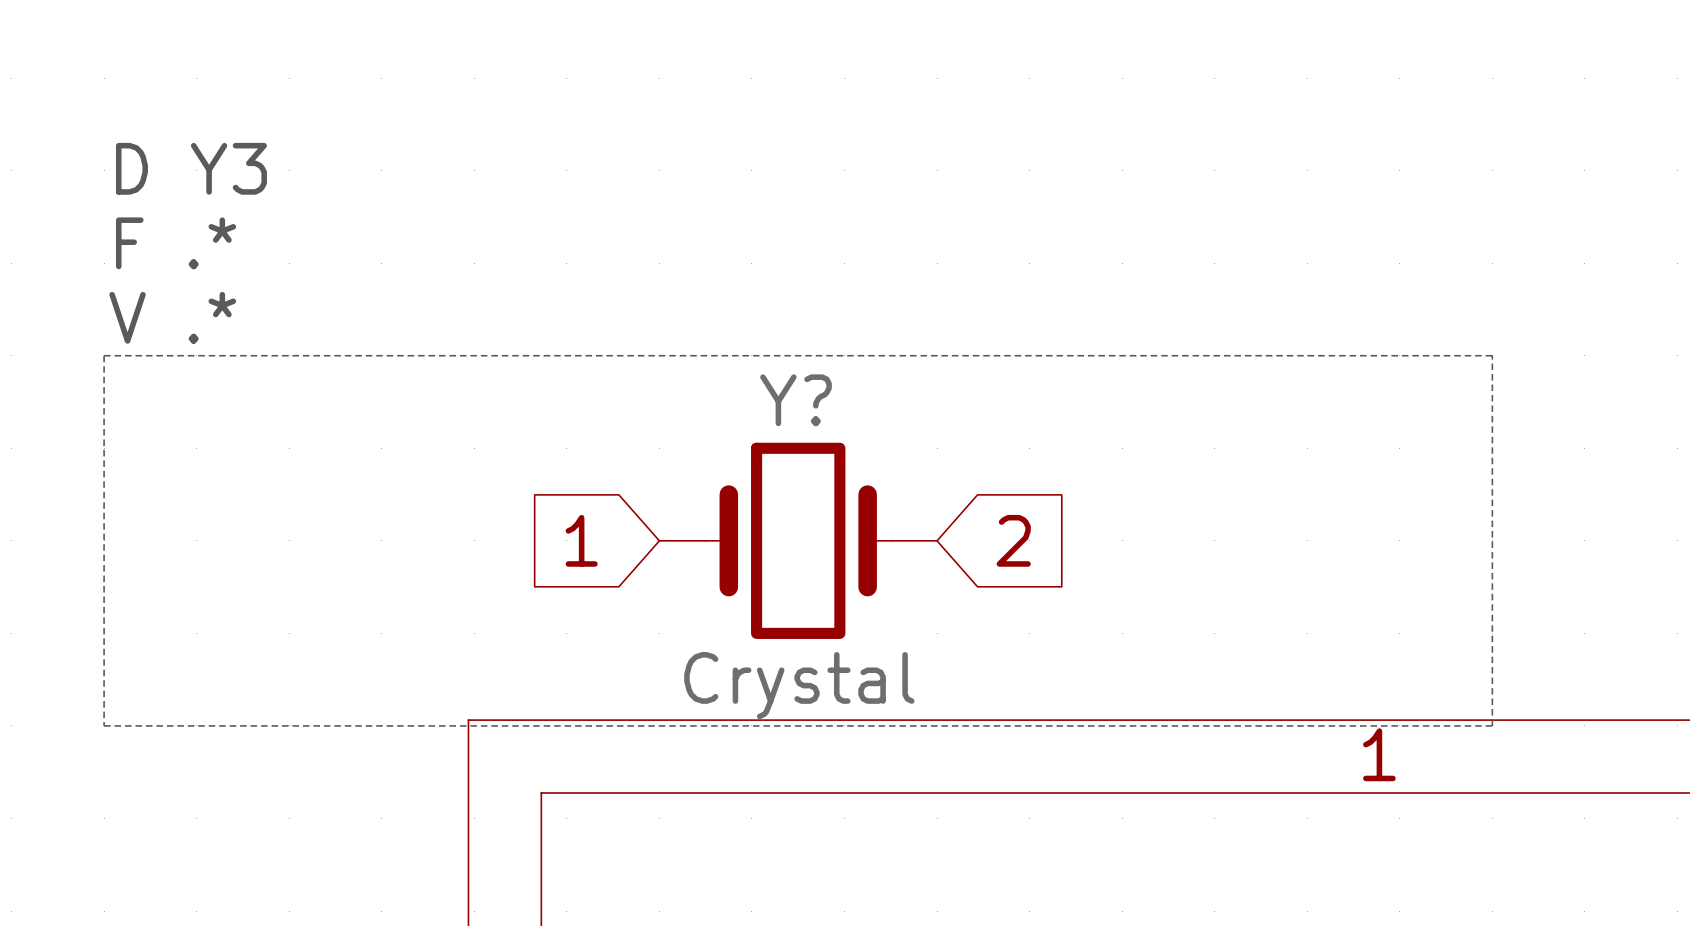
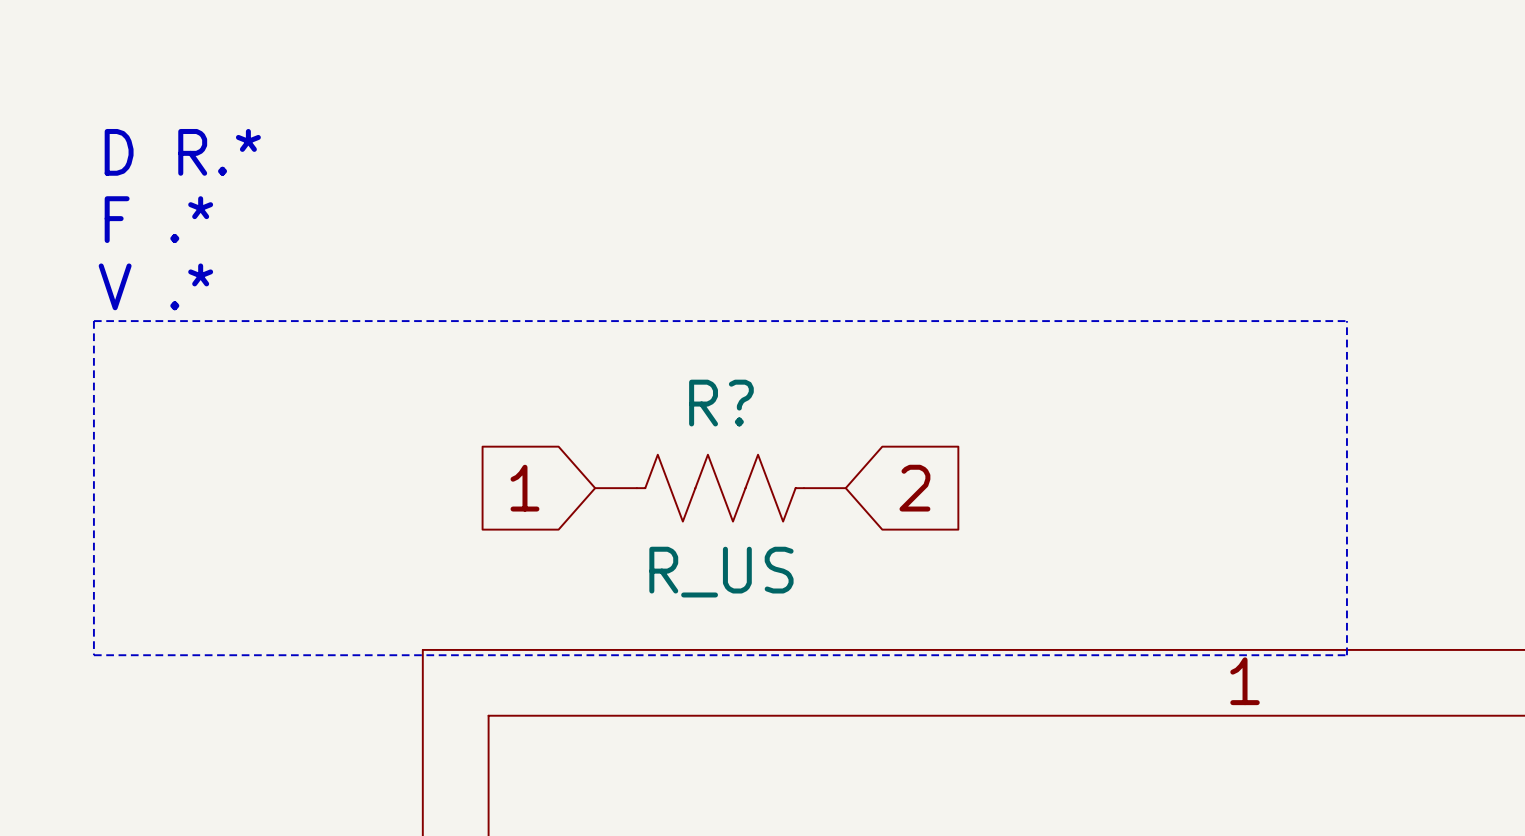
text: D Y3 (191, 168) -> D R.* (182, 152)
Y?: Crystal (798, 540) -> none
R?: none -> R_US (720, 488)

